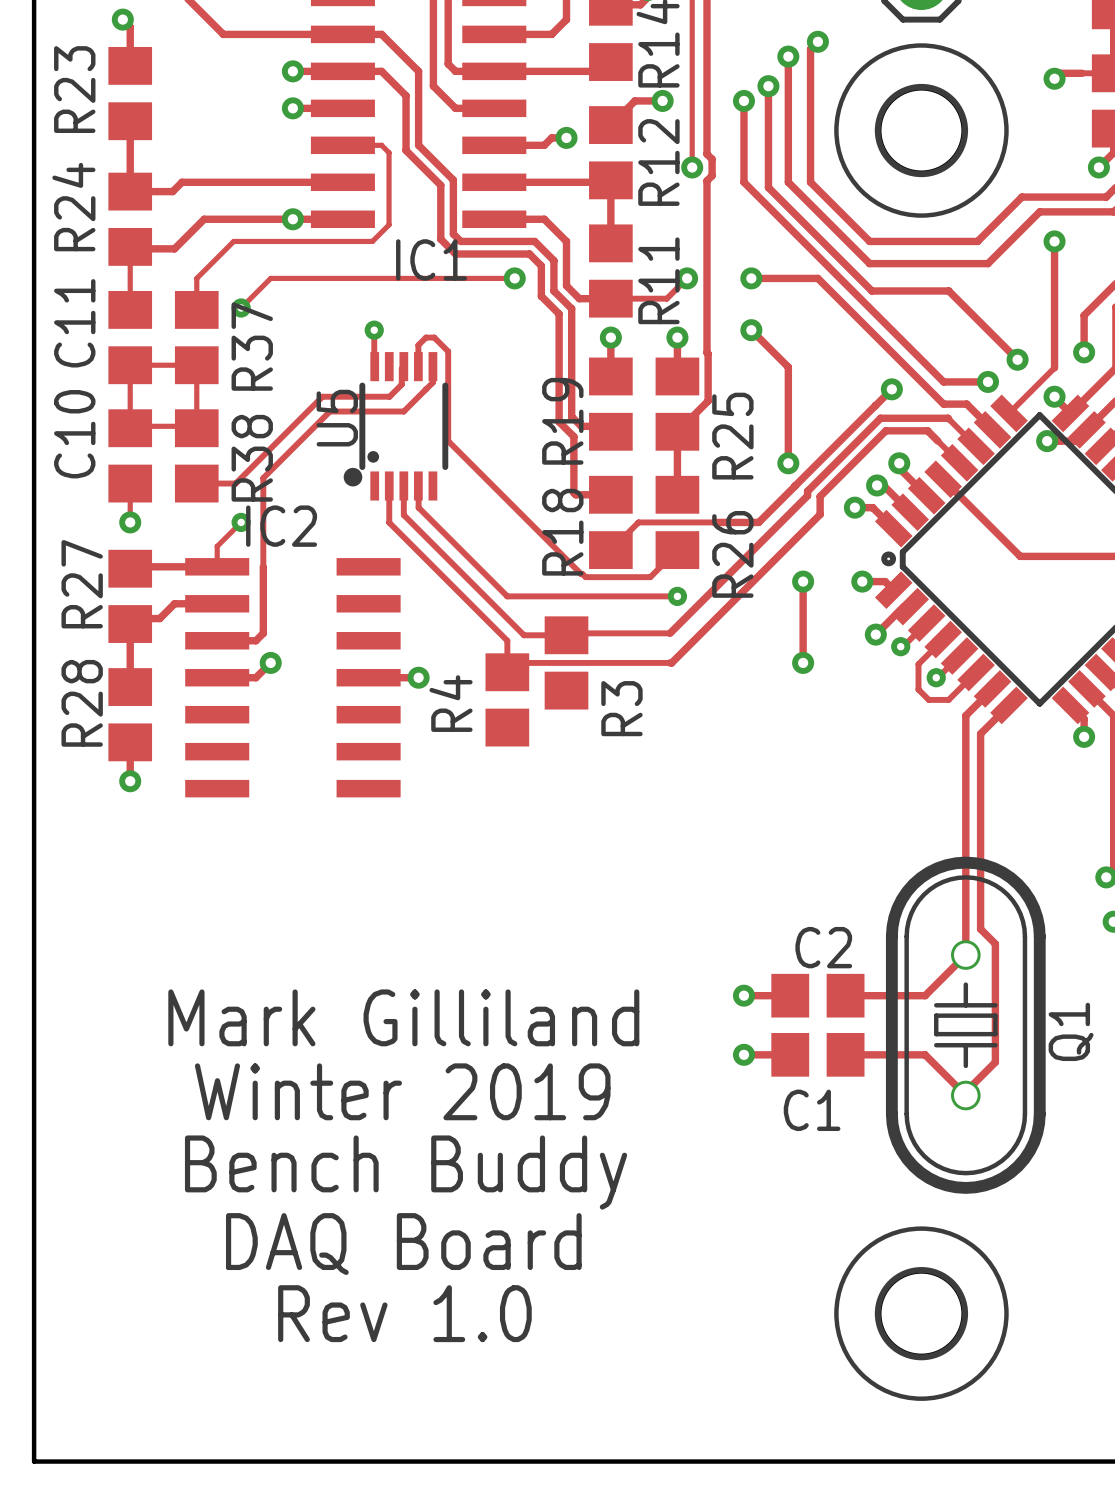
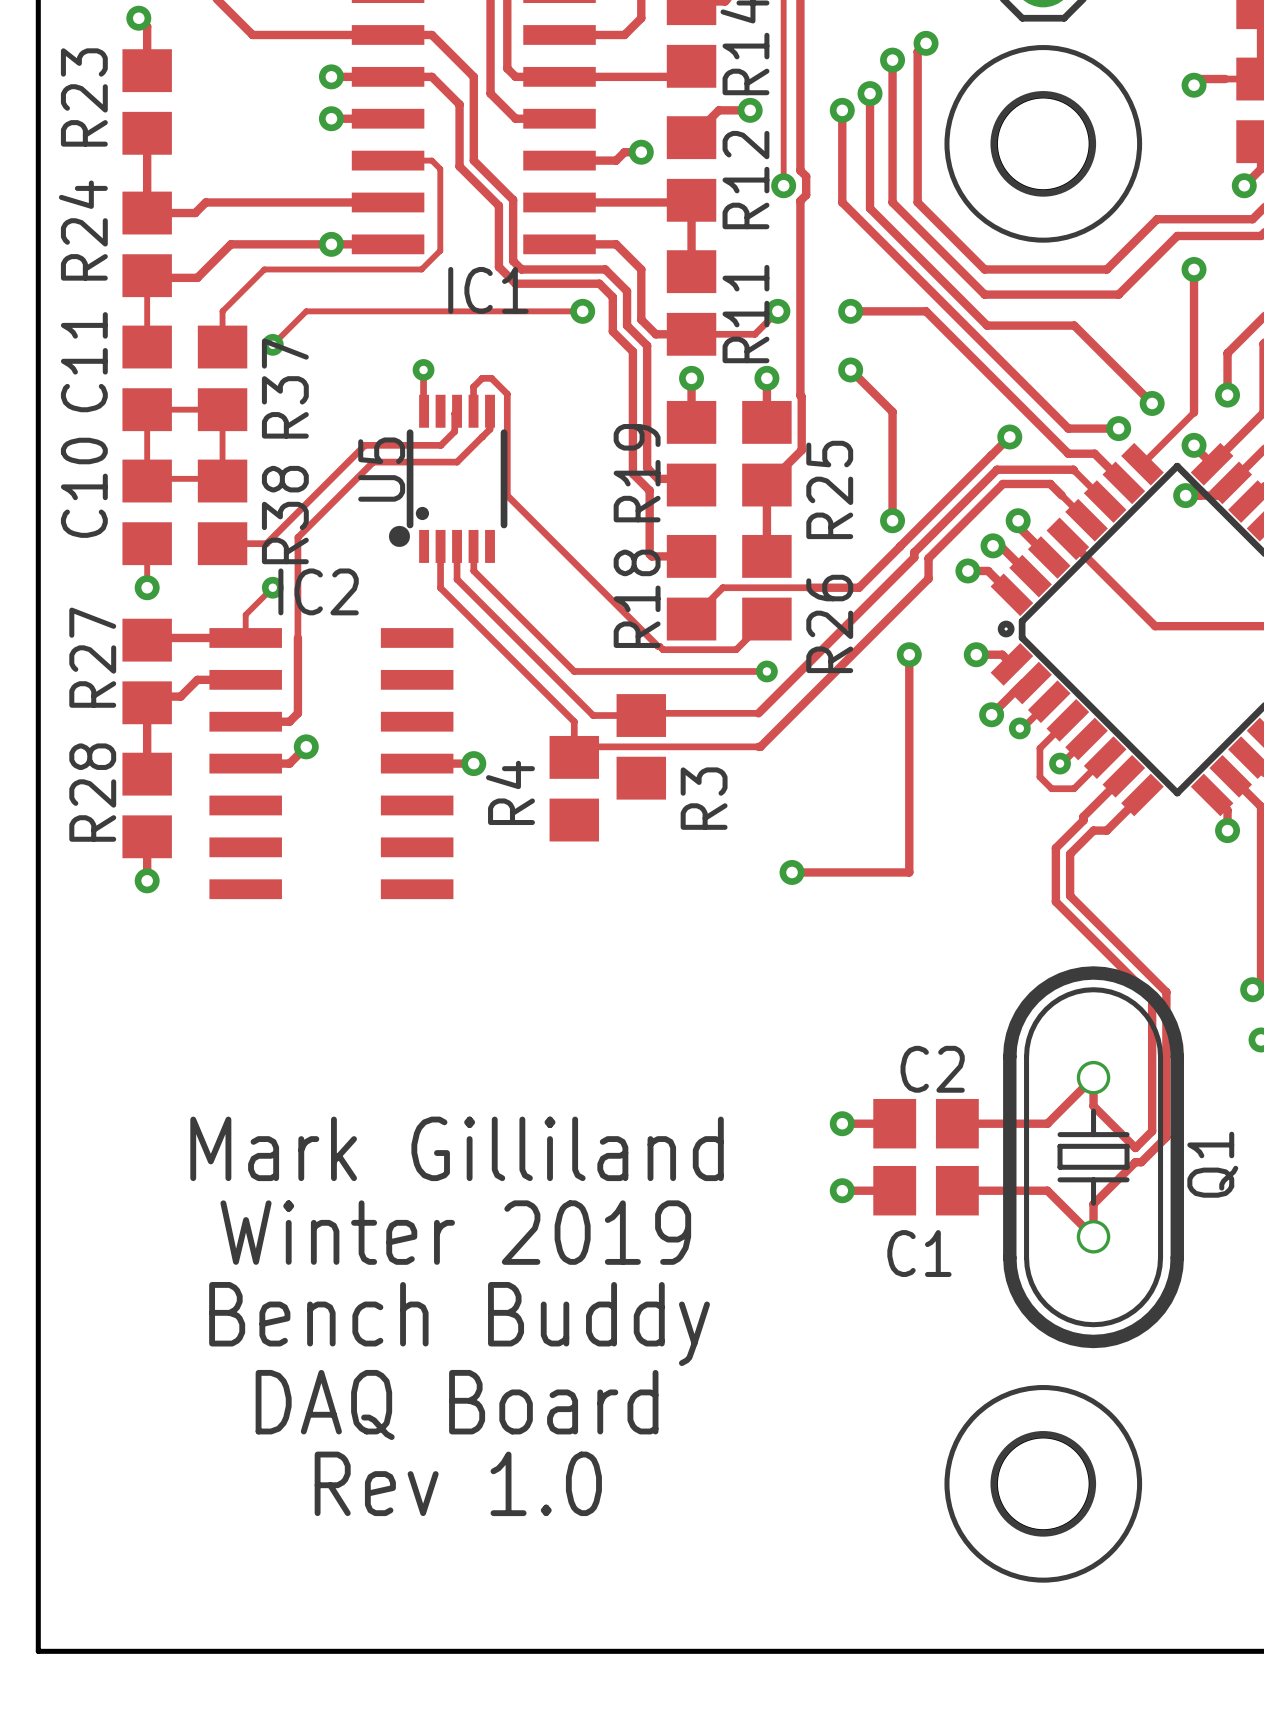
track: none -> (909, 746) (909, 872) (792, 872)
via position: (803, 662) -> (792, 872)
track: (965, 715) (965, 955) -> (1093, 806) (1083, 816) (1083, 820) (1055, 848) (1055, 901) (1152, 998) (1152, 1131) (1135, 1148) (1093, 1106) (1093, 1077)
track: (980, 733) (980, 929) (995, 943) (995, 1062) (965, 1091) -> (1110, 827) (1106, 830) (1093, 830) (1070, 854) (1070, 895) (1166, 992) (1166, 1137) (1141, 1162) (1135, 1162) (1093, 1204) (1093, 1232)

